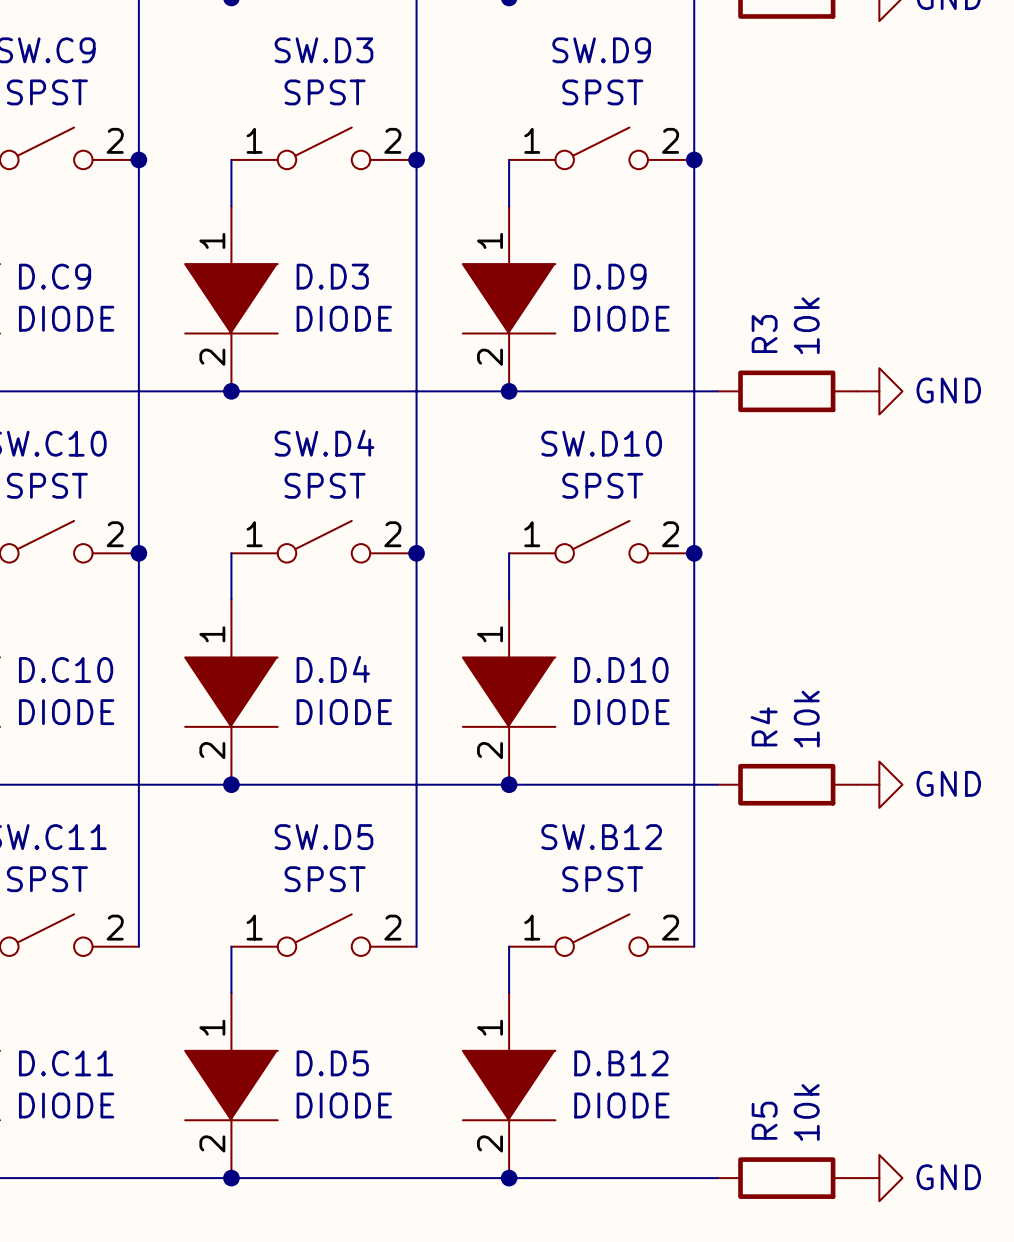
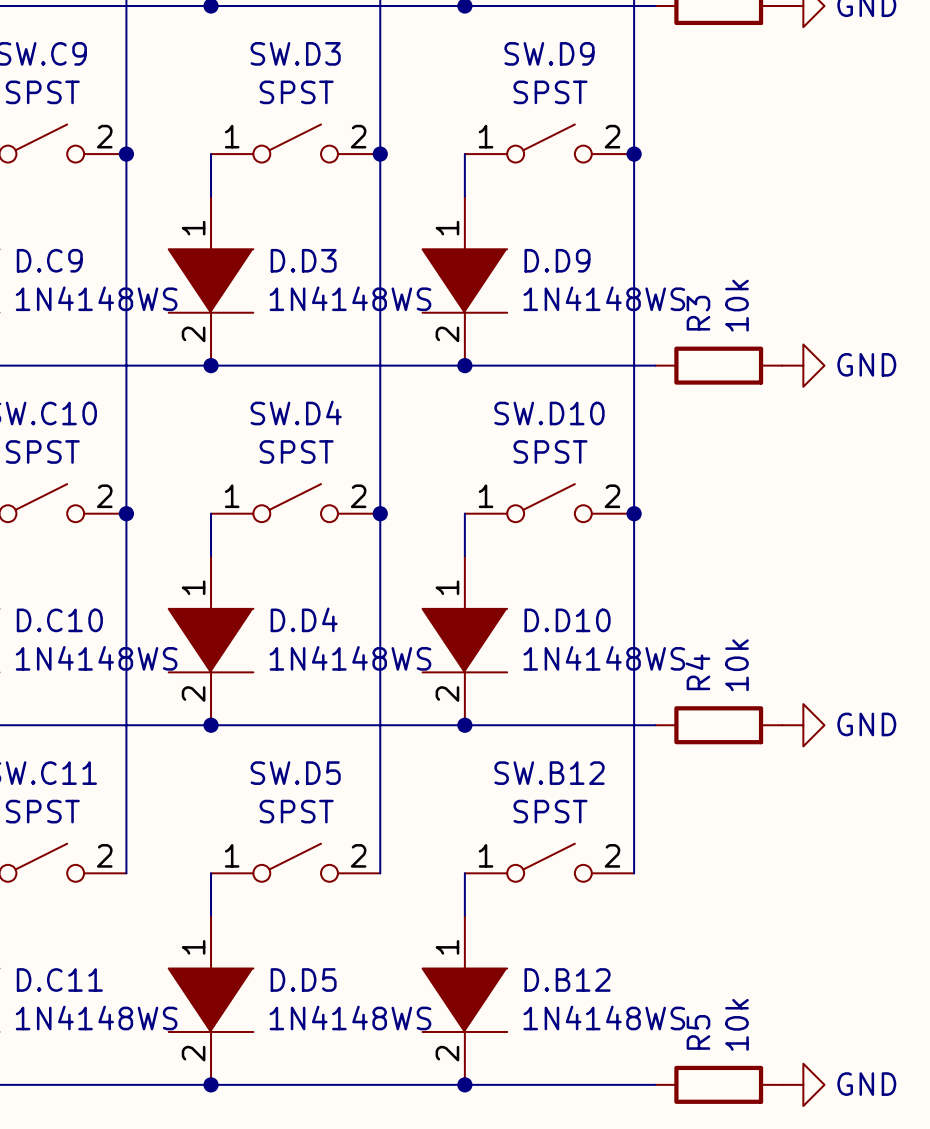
D.C9 value: DIODE (66, 318) -> 1N4148WS (96, 298)
D.D3 value: DIODE (344, 318) -> 1N4148WS (350, 298)
D.D9 value: DIODE (621, 318) -> 1N4148WS (604, 298)
D.C10 value: DIODE (66, 712) -> 1N4148WS (96, 658)
D.D4 value: DIODE (344, 712) -> 1N4148WS (350, 658)
D.D10 value: DIODE (621, 712) -> 1N4148WS (604, 658)
D.C11 value: DIODE (66, 1105) -> 1N4148WS (96, 1017)
D.D5 value: DIODE (344, 1105) -> 1N4148WS (350, 1017)
D.B12 value: DIODE (621, 1105) -> 1N4148WS (604, 1017)

